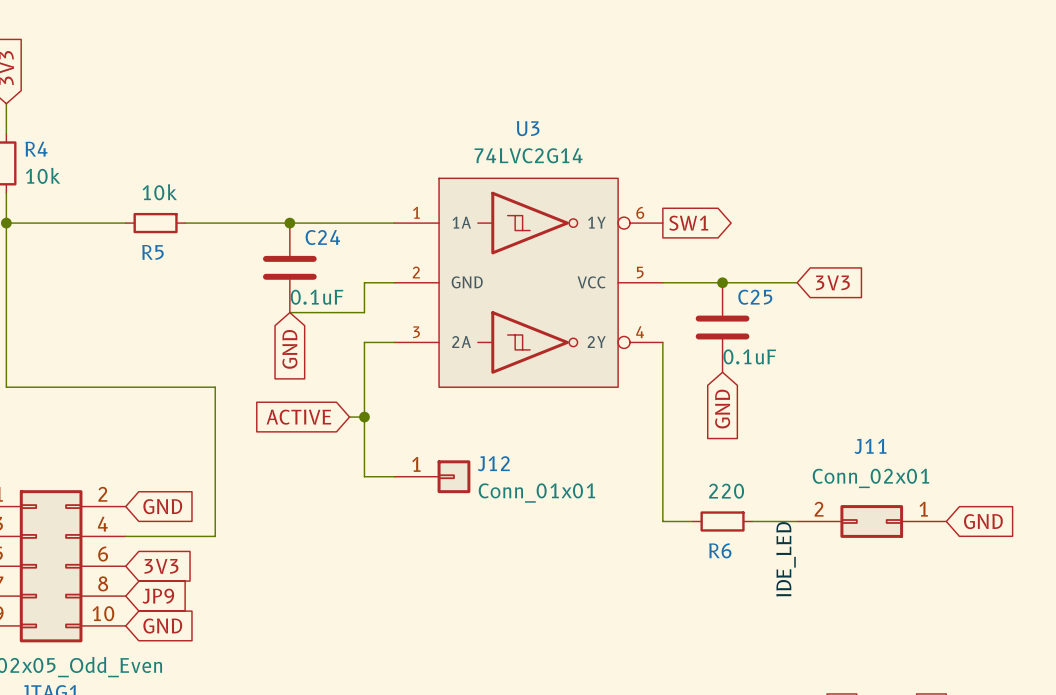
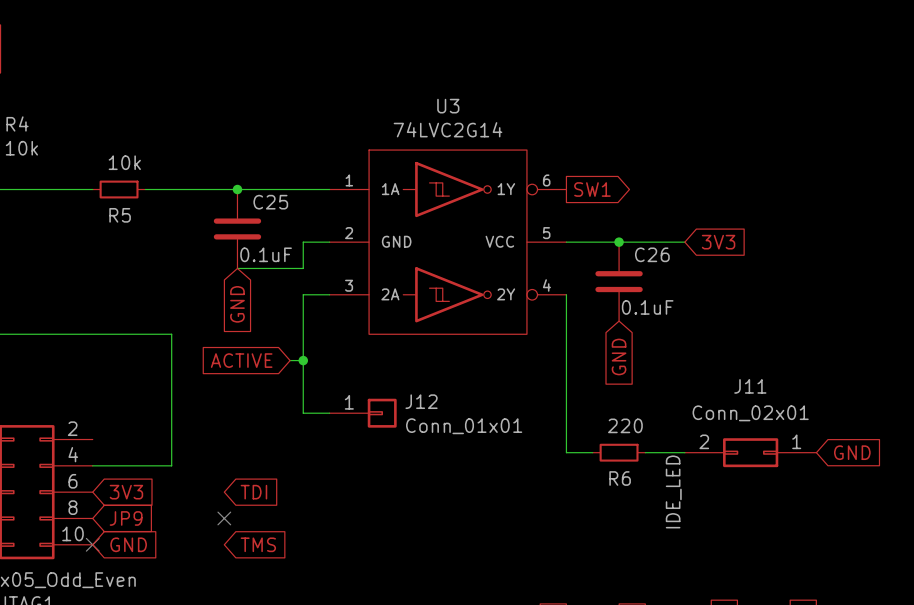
C24 name: C24 (322, 237) -> C25 (270, 202)
C25 name: C25 (755, 297) -> C26 (652, 254)
global label: GND (162, 506) -> none
global label: none -> TDI (253, 492)
no-connect mark: none -> (224, 518)
no-connect mark: none -> (92, 544)
global label: none -> TMS (258, 544)

